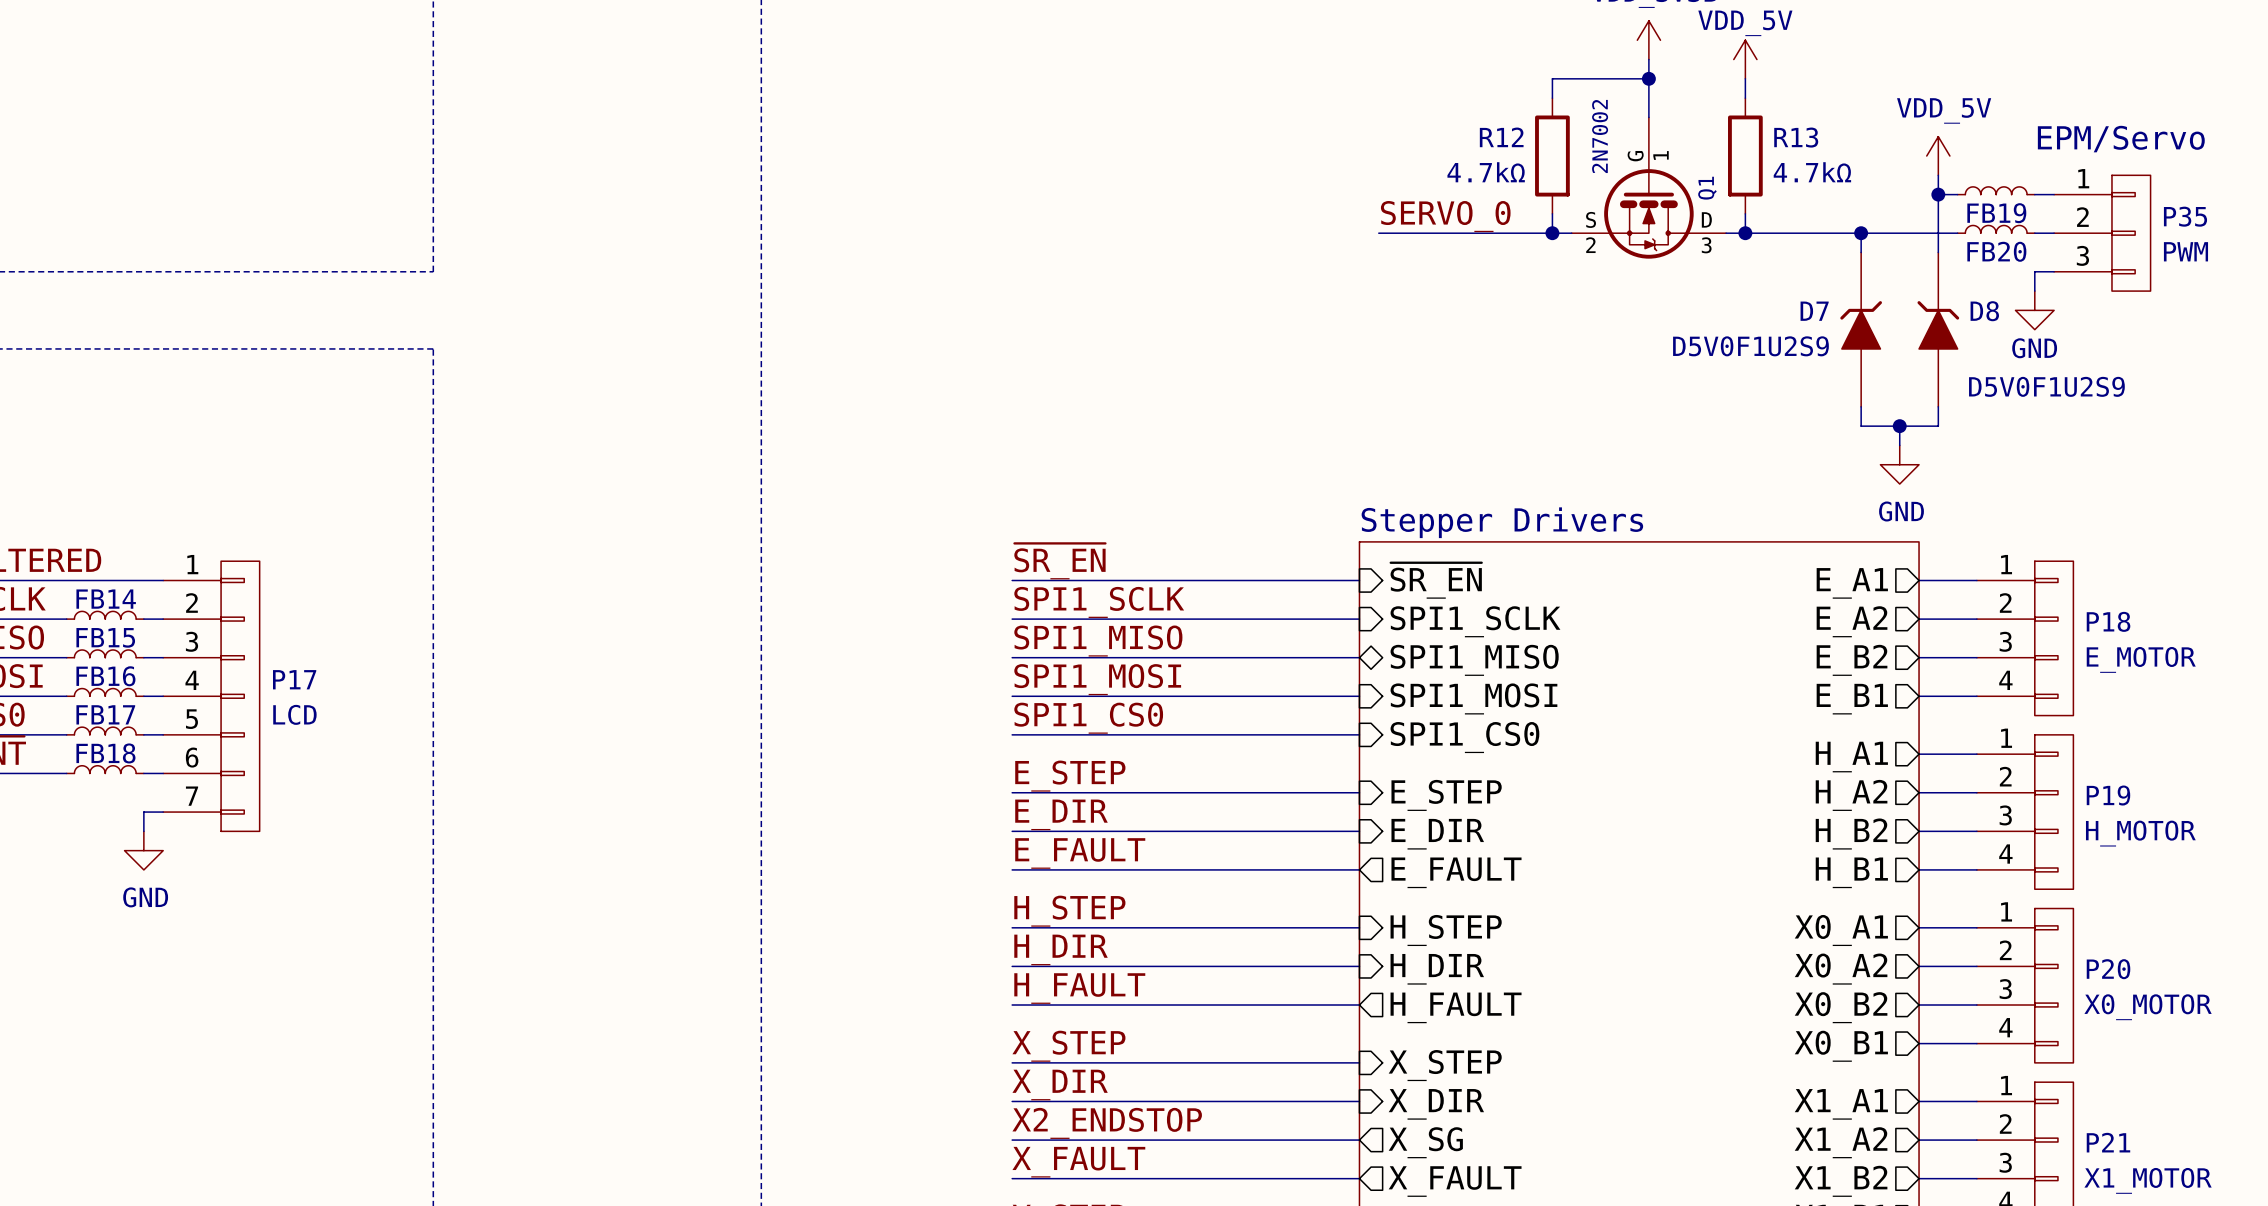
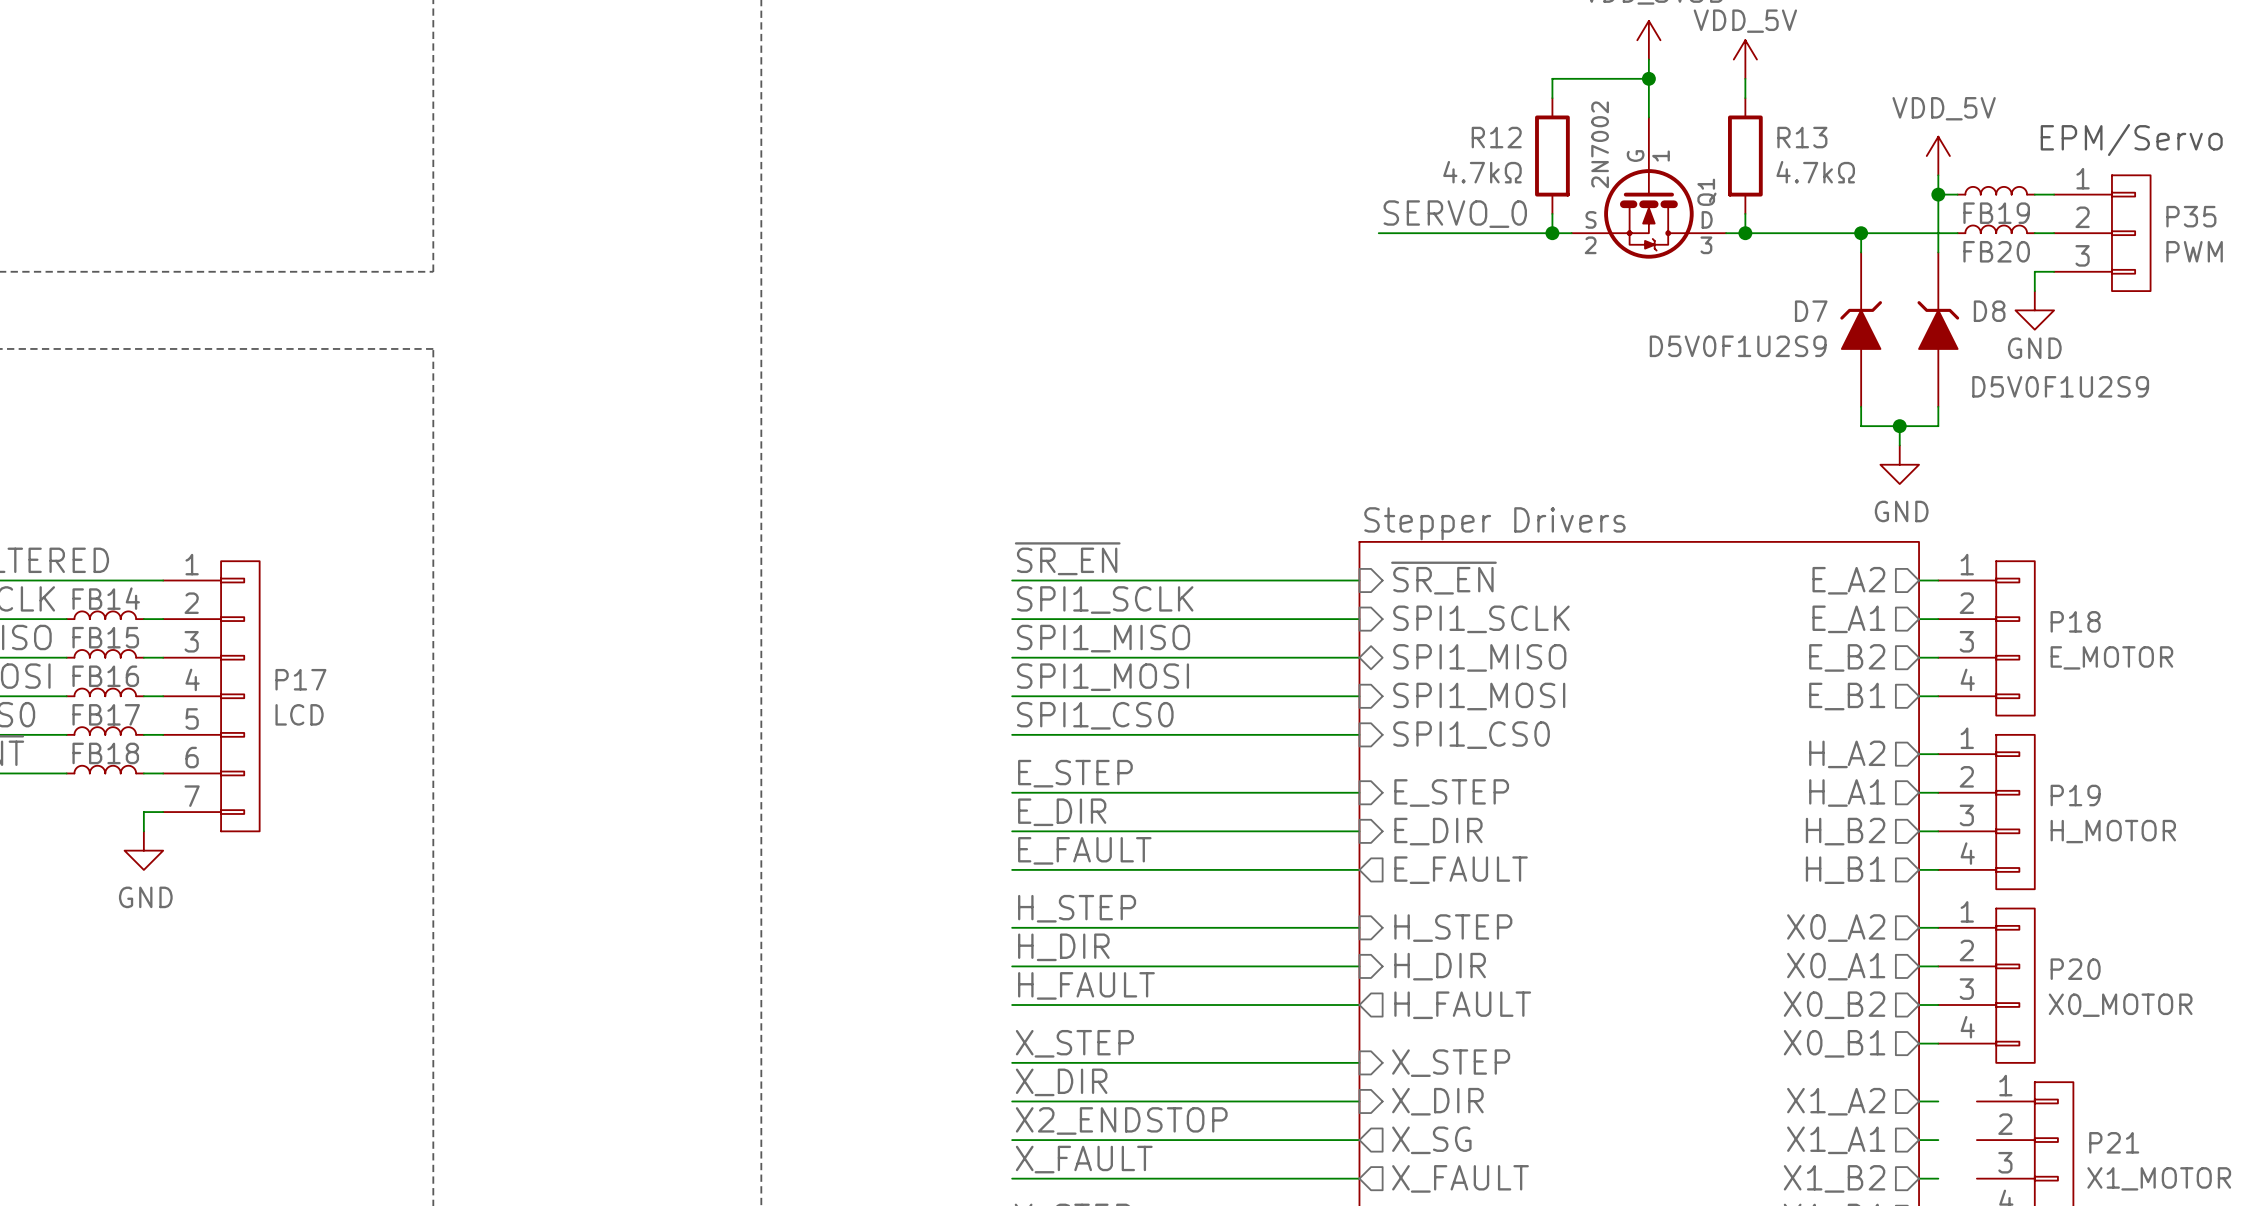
sheet pin: E_A1 (1852, 583) -> E_A2 (1848, 580)
sheet pin: E_A2 (1852, 621) -> E_A1 (1848, 619)
P18 position: (2025, 638) -> (1986, 638)
sheet pin: H_A1 (1851, 757) -> H_A2 (1847, 754)
sheet pin: H_A2 (1851, 795) -> H_A1 (1847, 792)
P19 position: (2025, 812) -> (1986, 812)
sheet pin: X0_A1 (1841, 930) -> X0_A2 (1836, 928)
sheet pin: X0_A2 (1841, 969) -> X0_A1 (1836, 966)
P20 position: (2025, 985) -> (1986, 985)
wire: (1938, 1101) (1976, 1101) -> none
sheet pin: X1_A1 (1841, 1104) -> X1_A2 (1836, 1101)
wire: (1938, 1140) (1976, 1140) -> none
sheet pin: X1_A2 (1841, 1142) -> X1_A1 (1836, 1140)
wire: (1938, 1178) (1976, 1178) -> none

